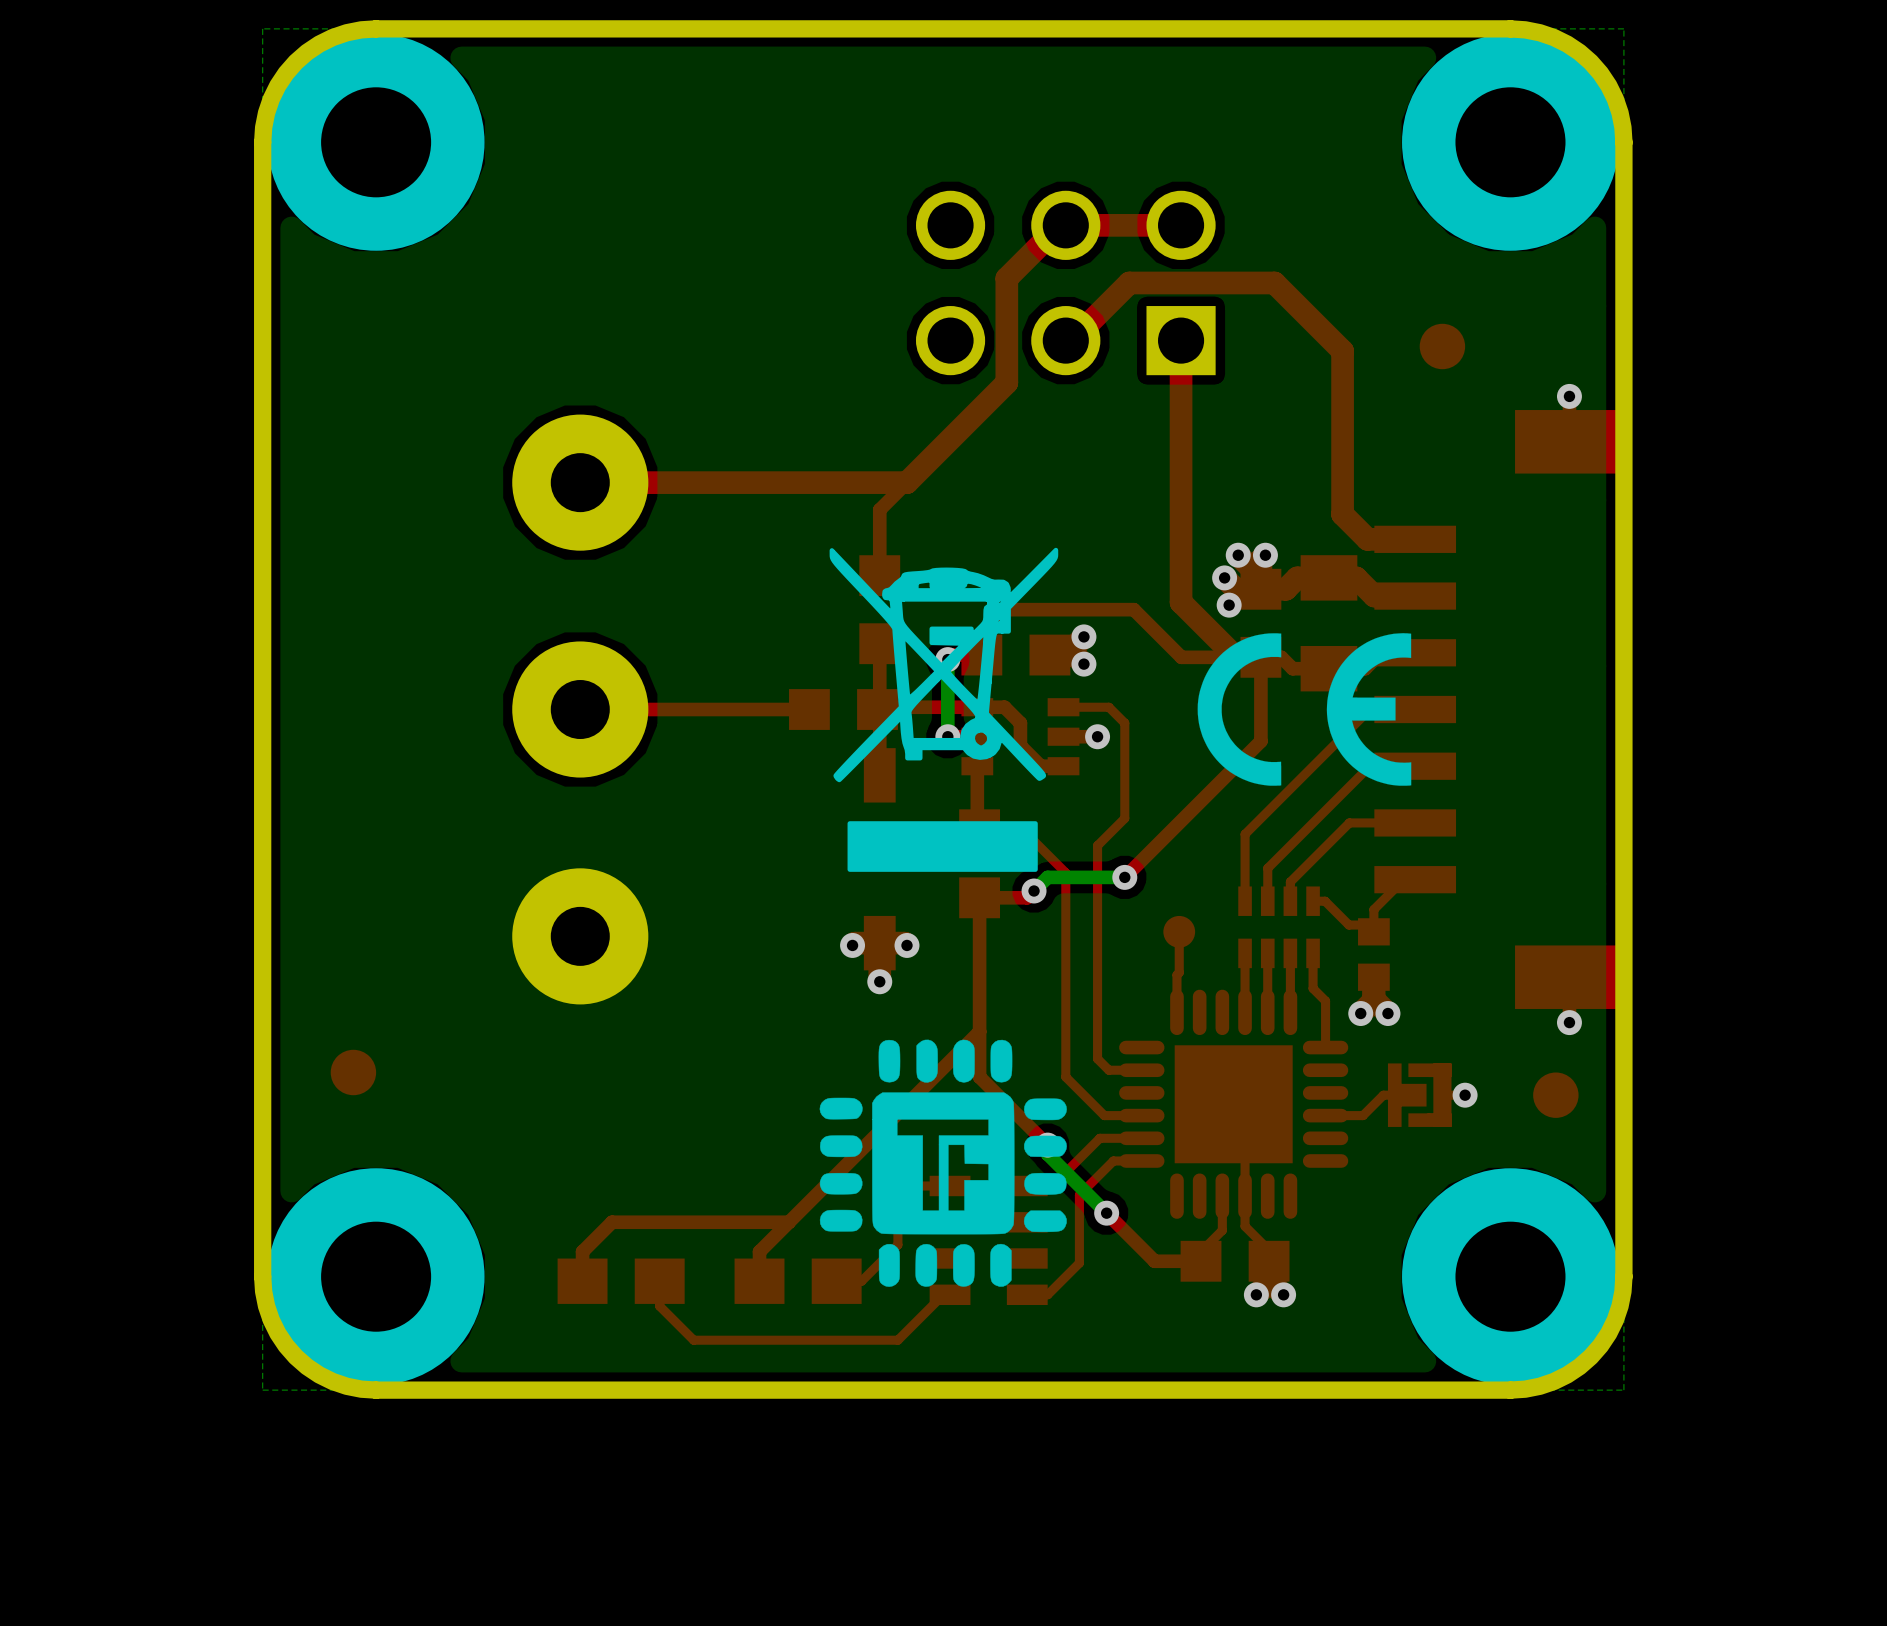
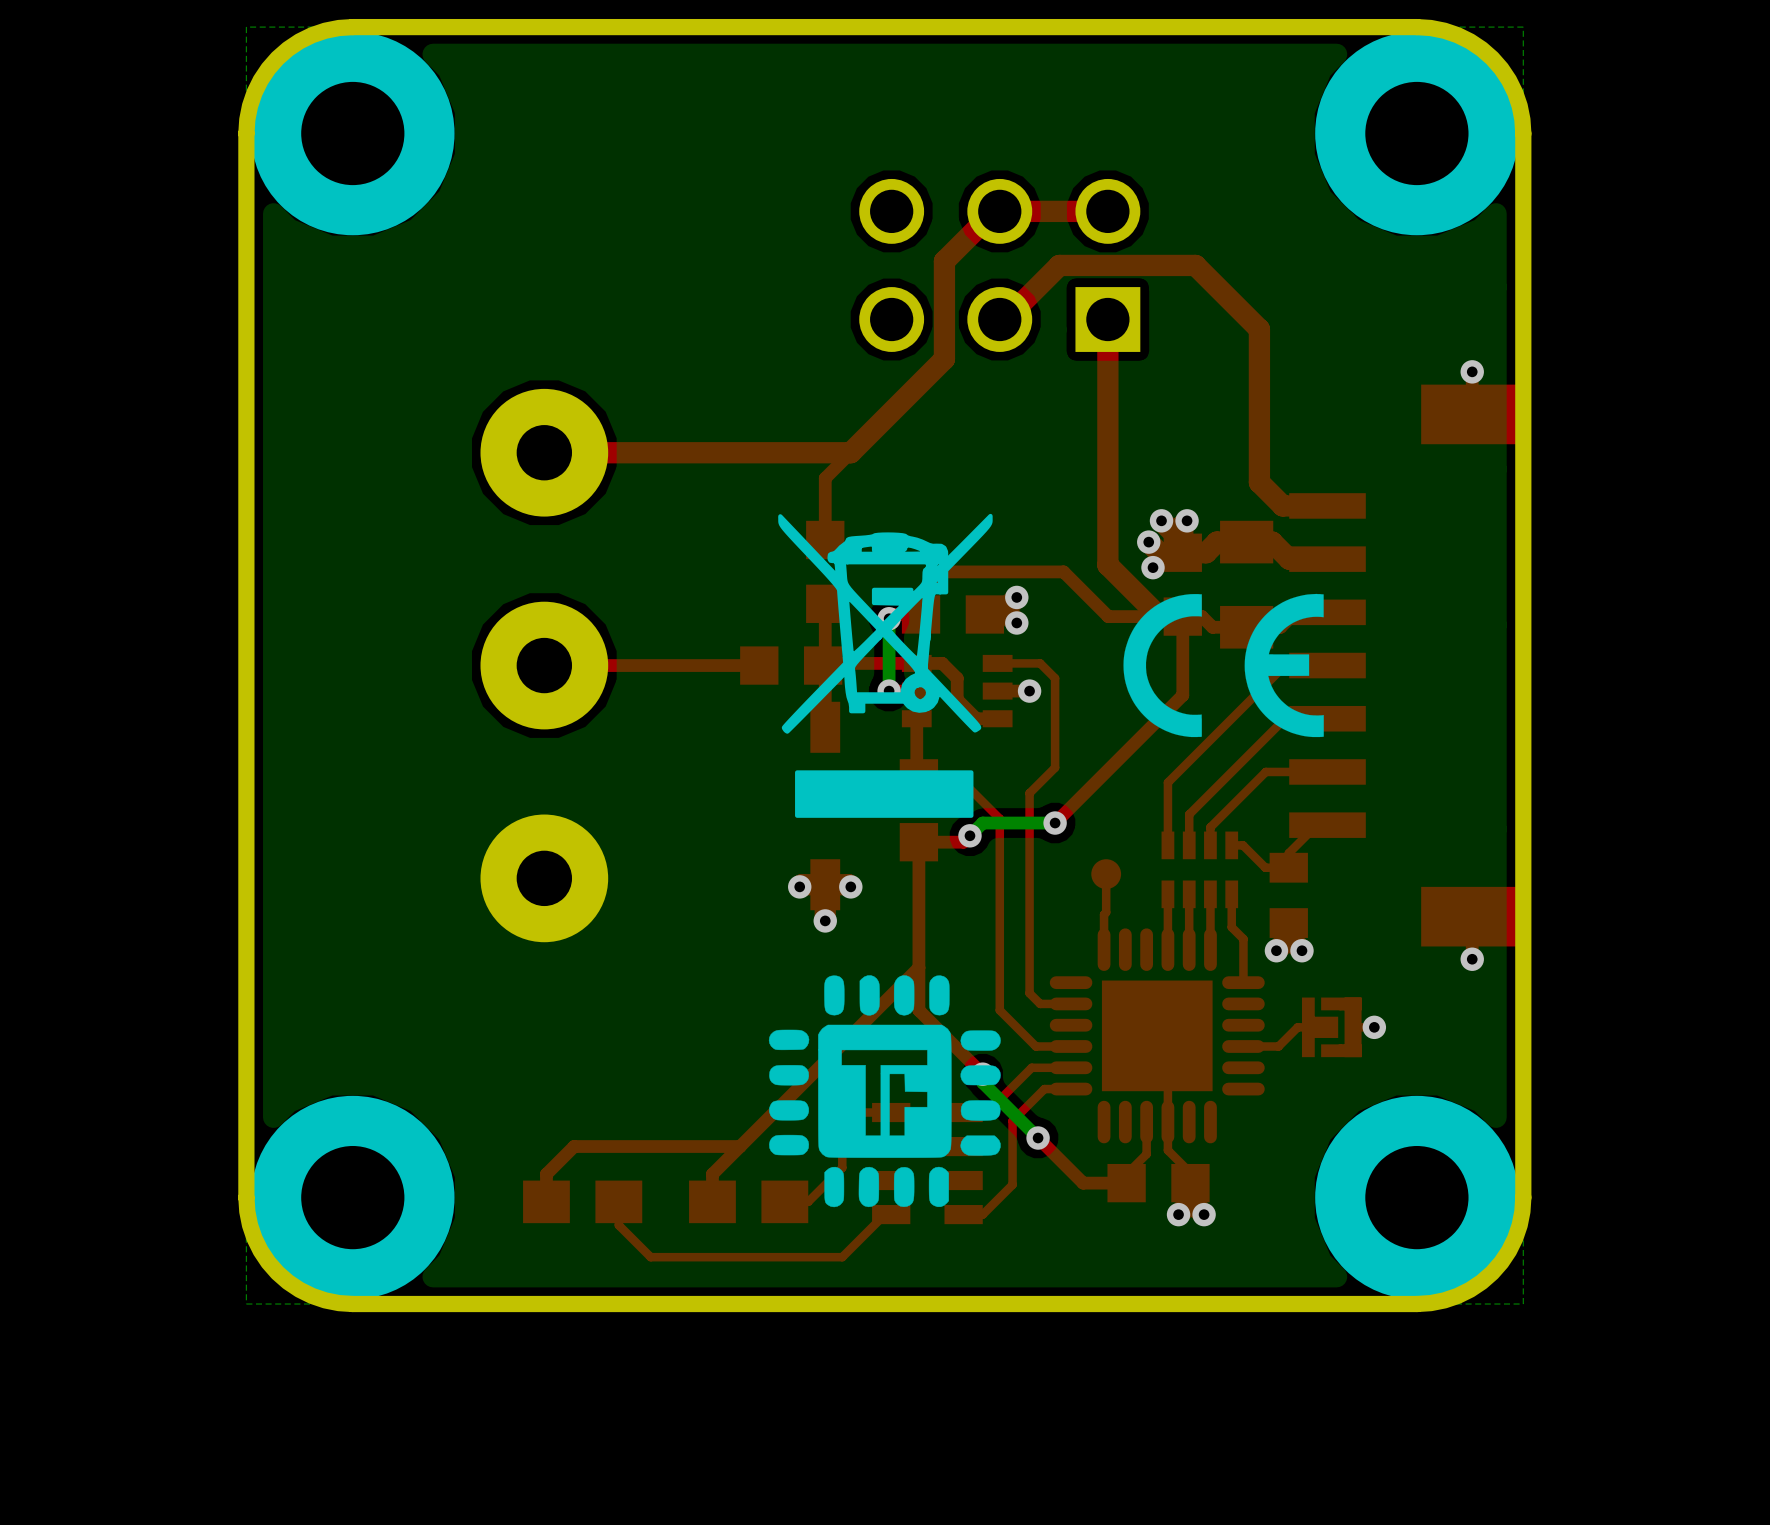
part: (1442, 346) -> none
part footprint: [1358, 918, 1390, 991] -> [1269, 852, 1308, 938]
part: (353, 1072) -> none
part: (1555, 1095) -> none

